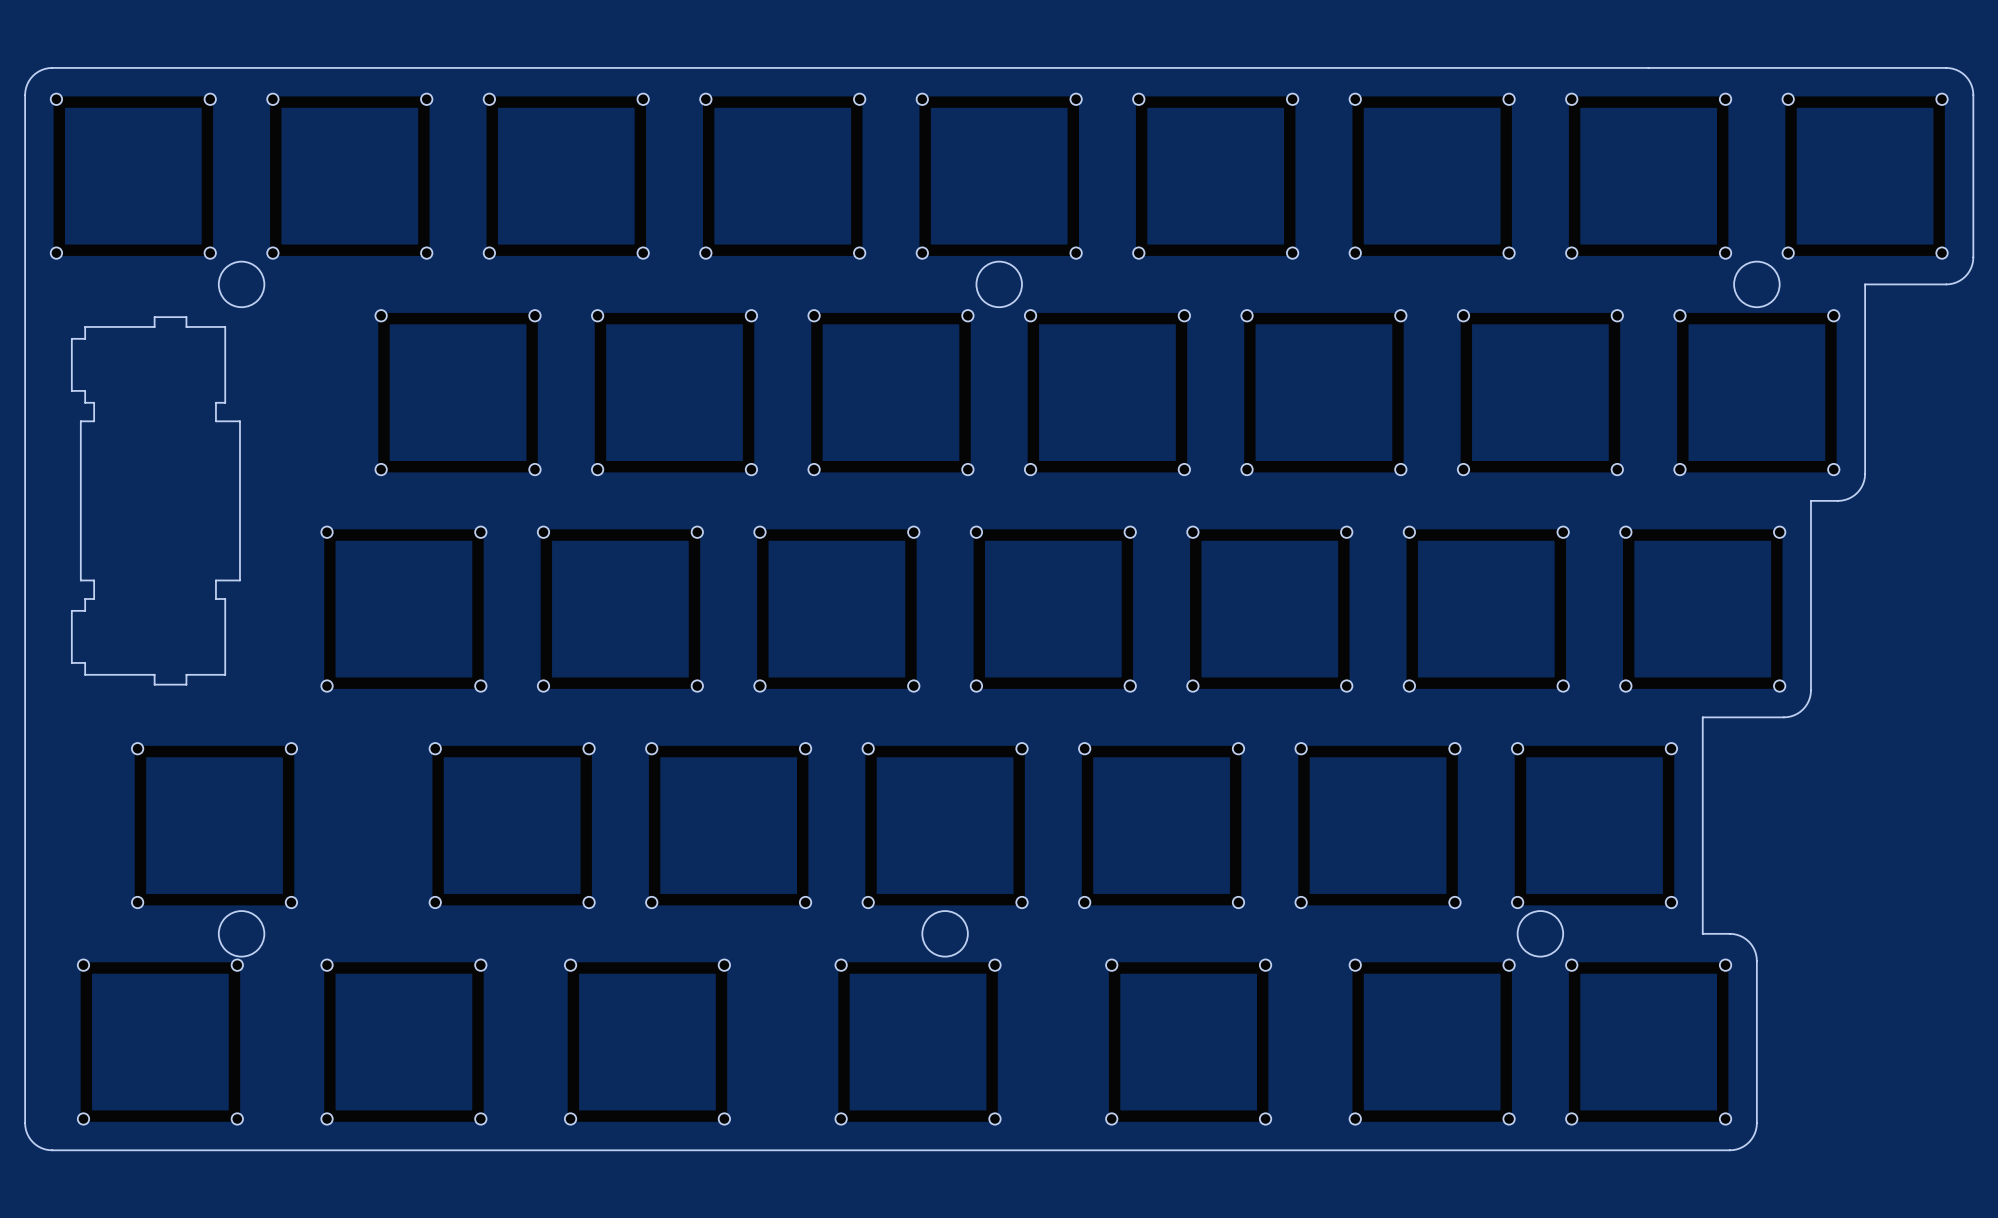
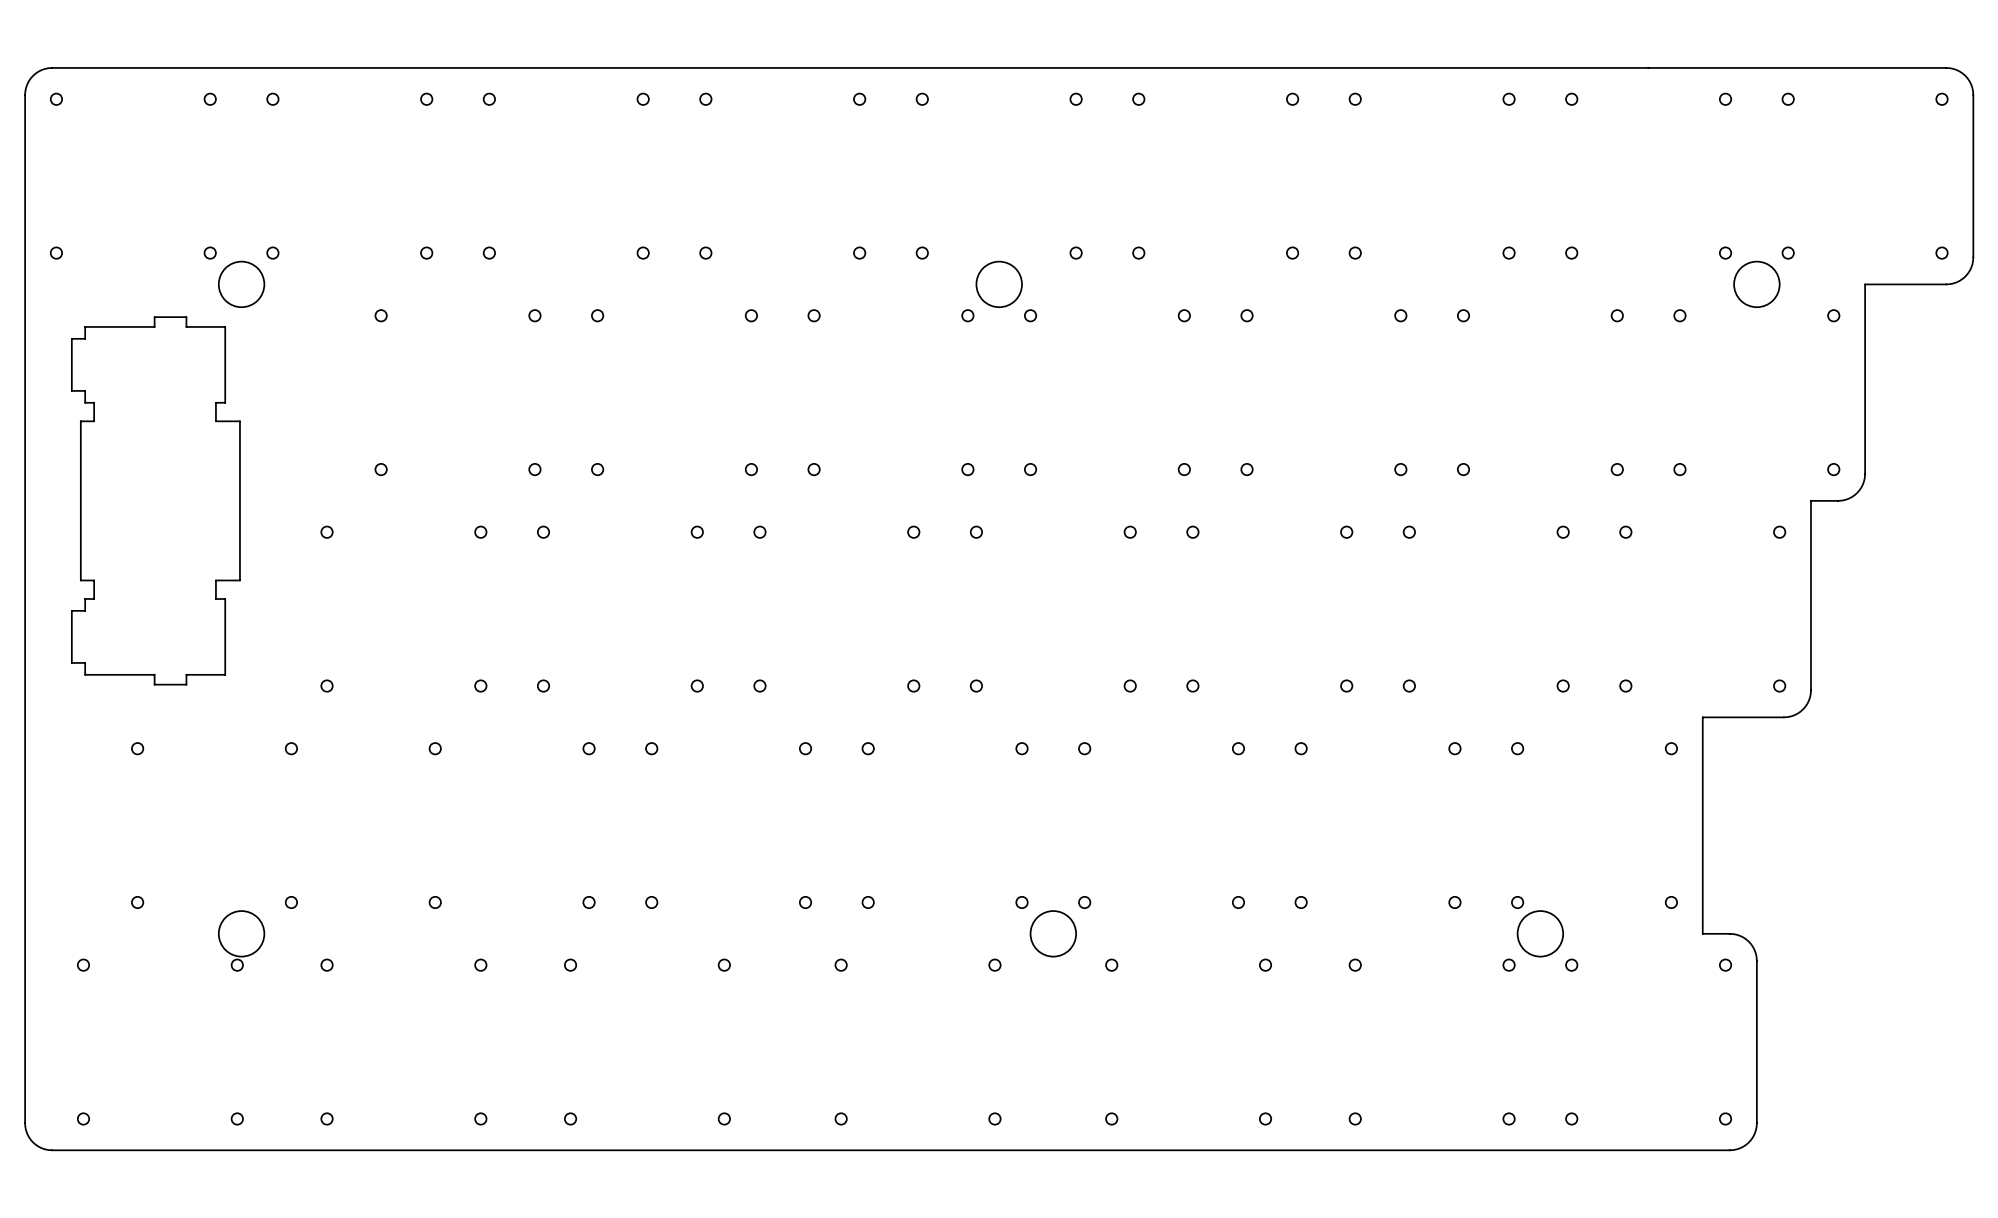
round board edge position: (945, 933) -> (1053, 933)

